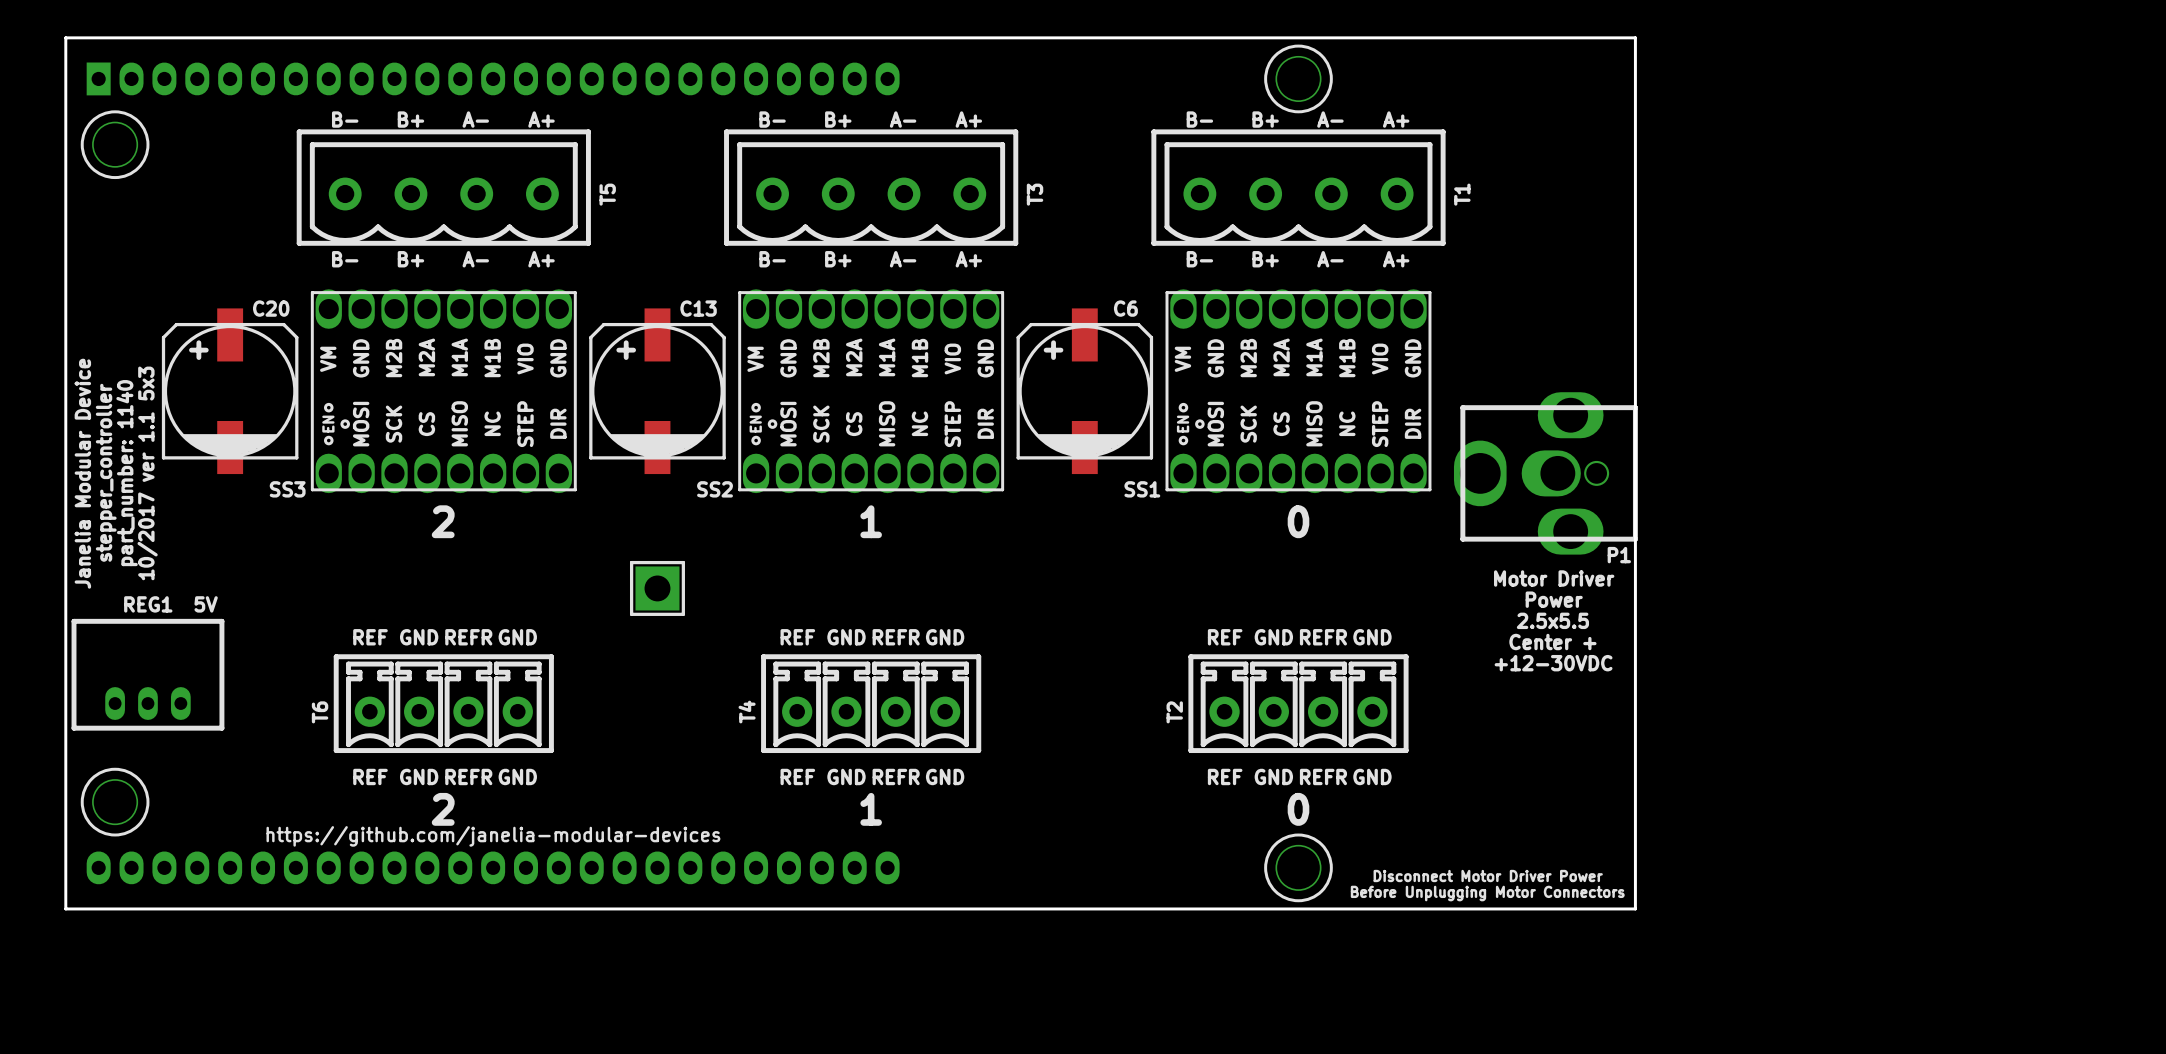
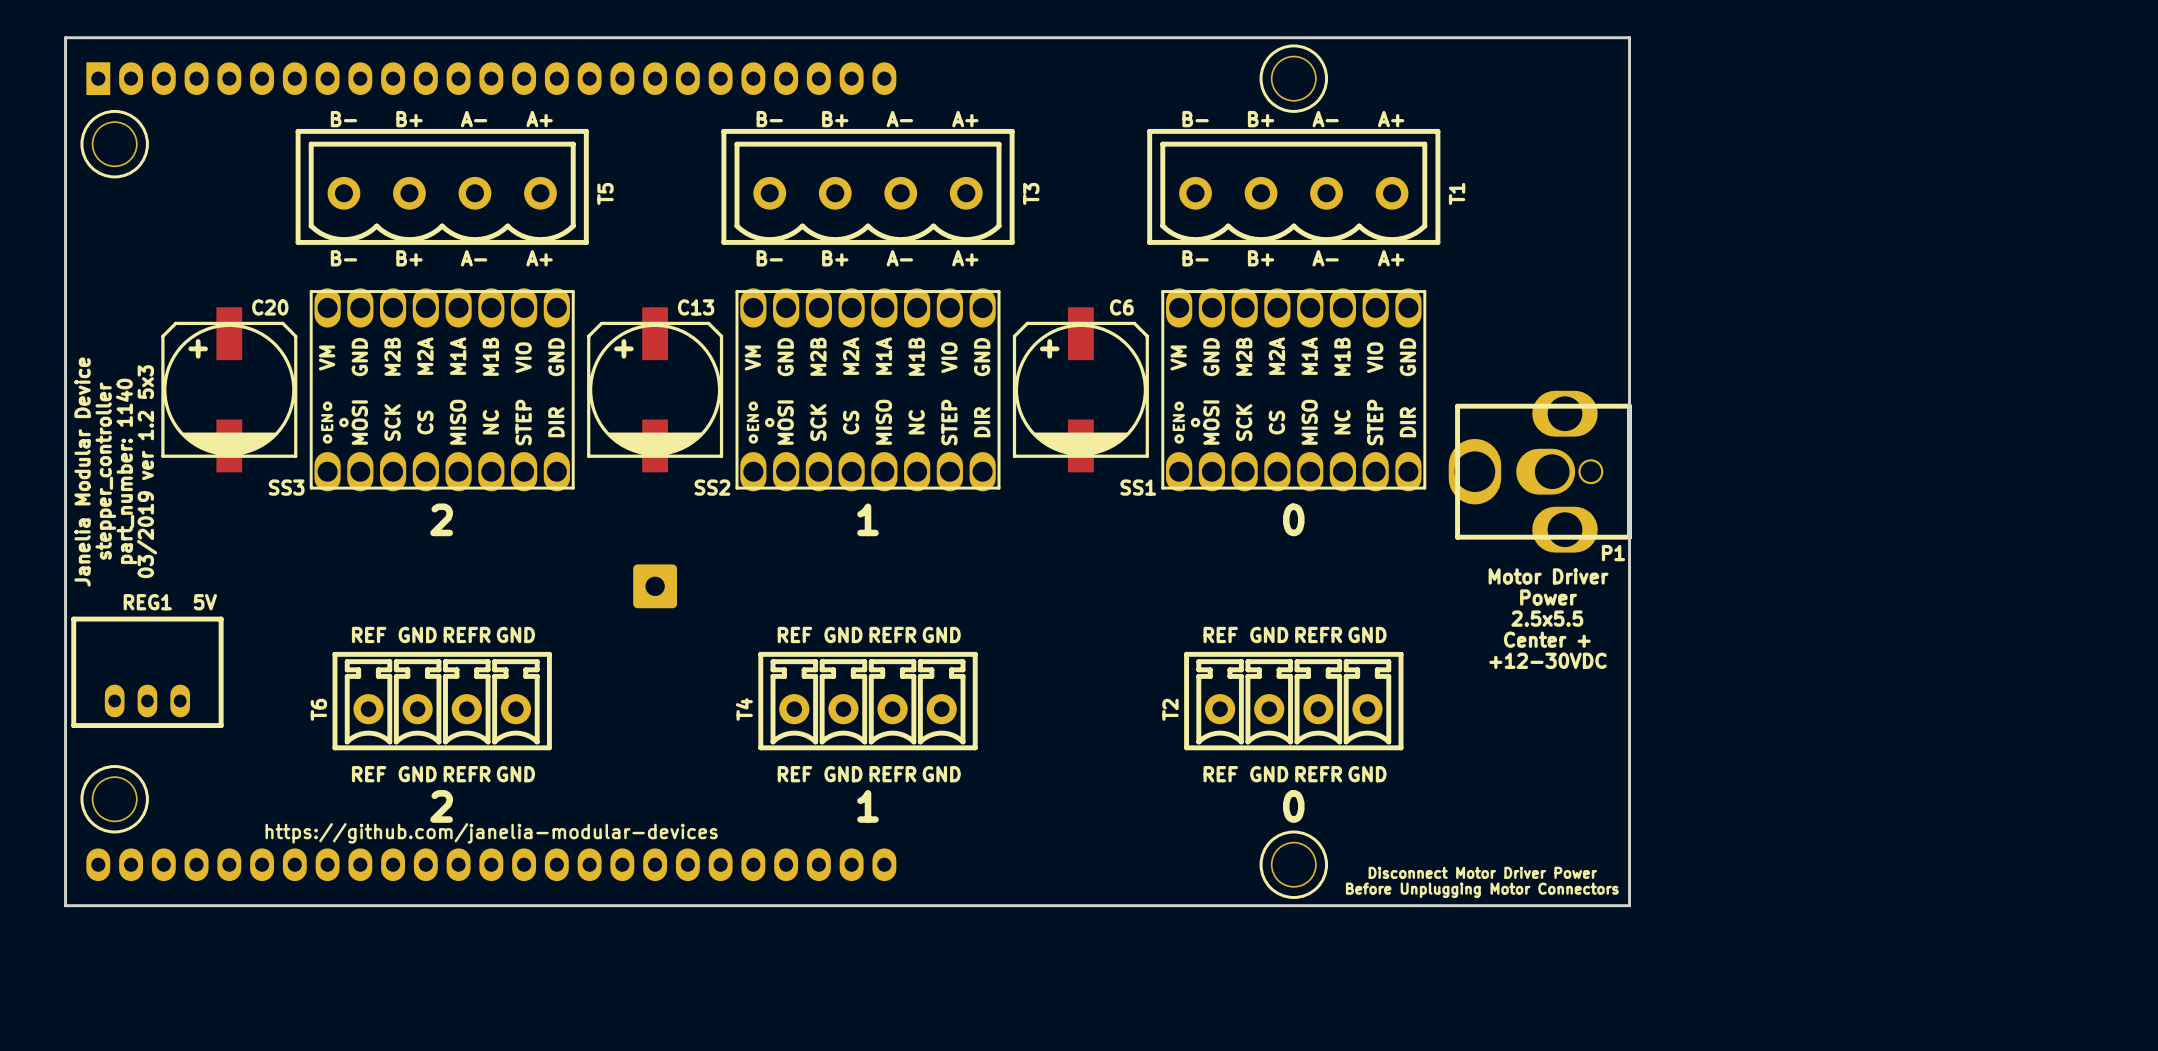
text: 10/2017 ver 1.1 5x3 (147, 473) -> 03/2019 ver 1.2 5x3 (147, 471)
part footprint: [629, 560, 685, 616] -> [633, 564, 678, 609]

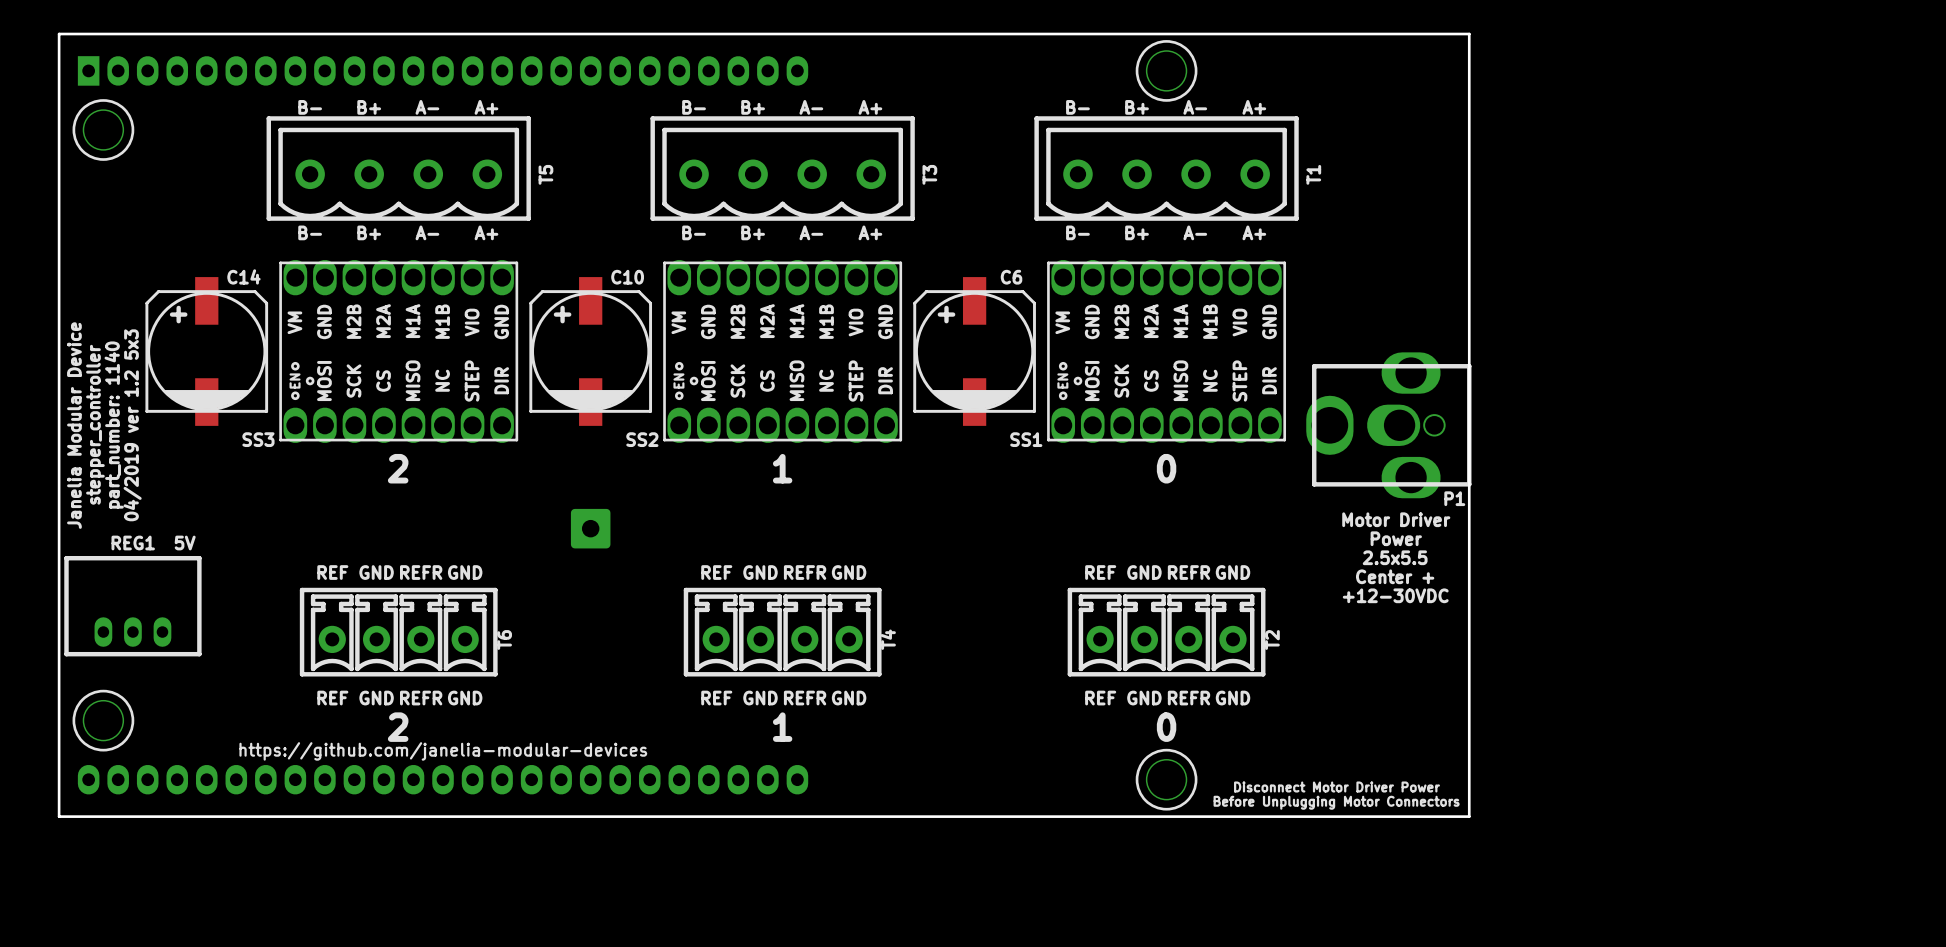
C20 name: C20 (270, 307) -> C14 (243, 276)
C13 name: C13 (696, 307) -> C10 (627, 277)
text: 03/2019 ver 1.2 5x3 (147, 471) -> 04/2019 ver 1.2 5x3 (132, 425)
T6 name position: T6 (318, 709) -> T6 (504, 639)
T4 name position: T4 (744, 709) -> T4 (888, 639)
T2 name position: T2 (1170, 709) -> T2 (1272, 639)

